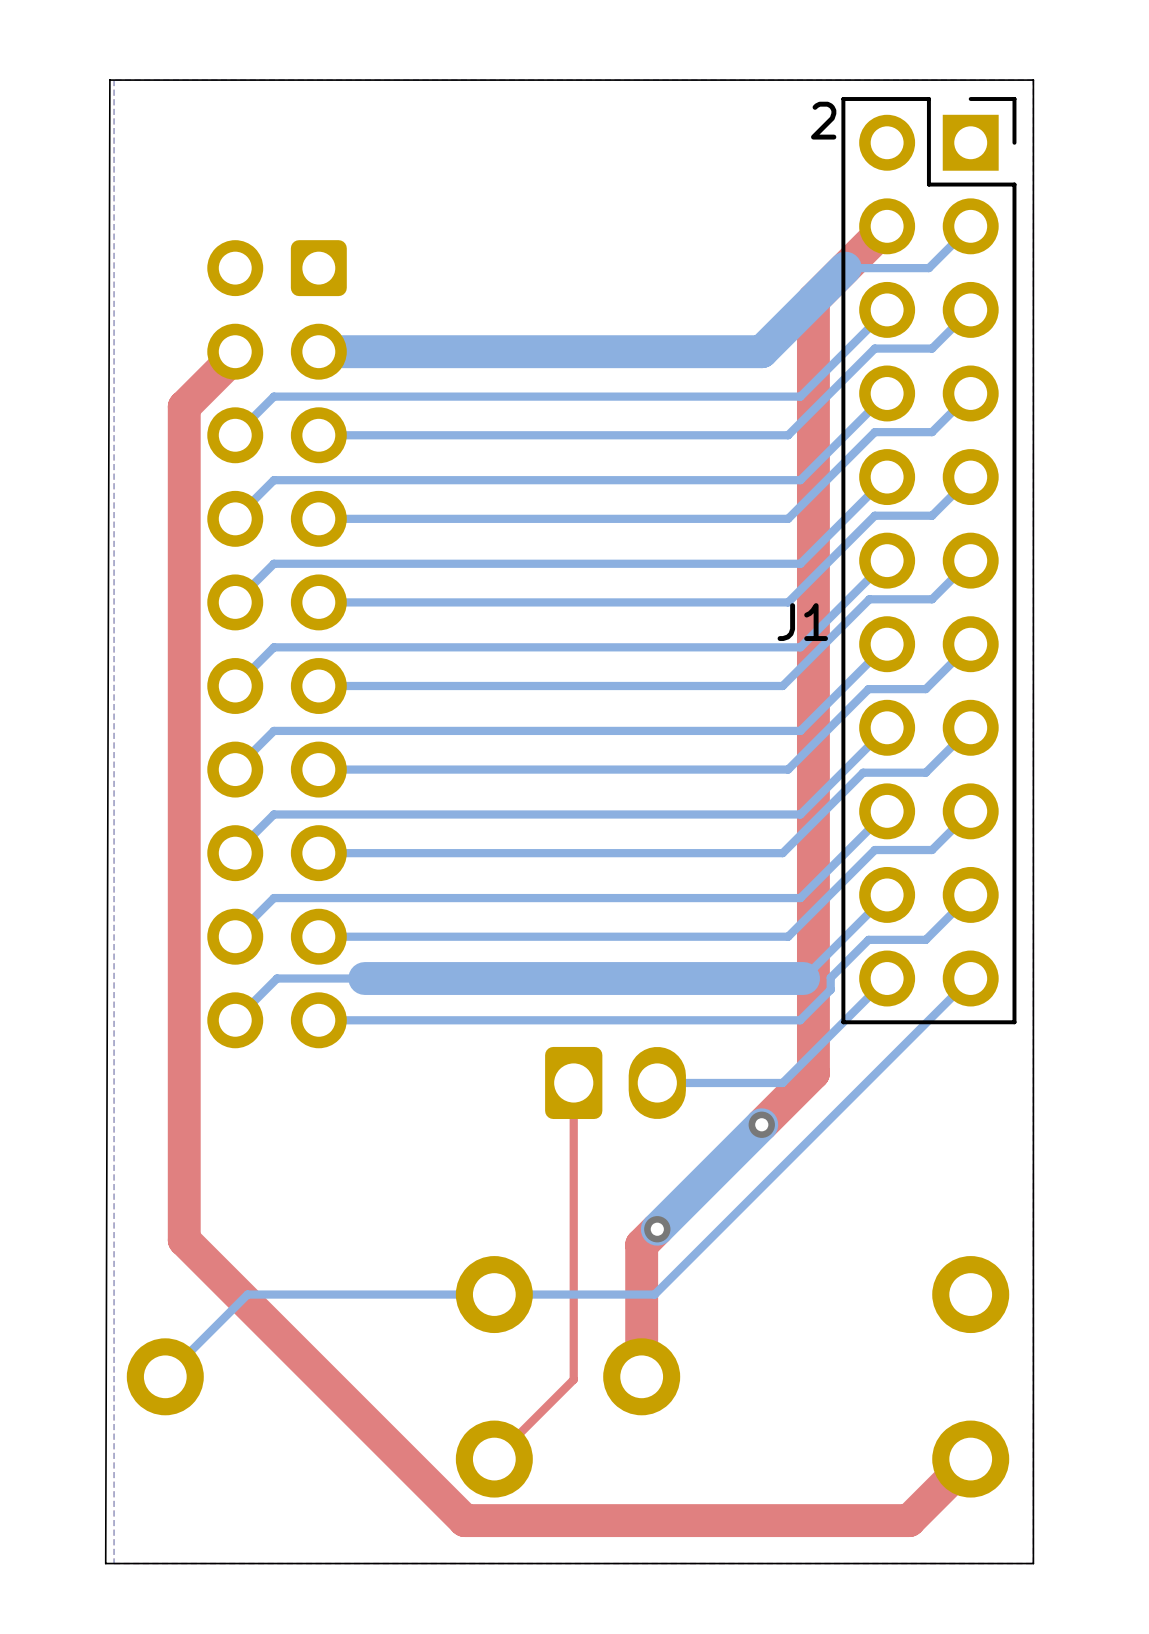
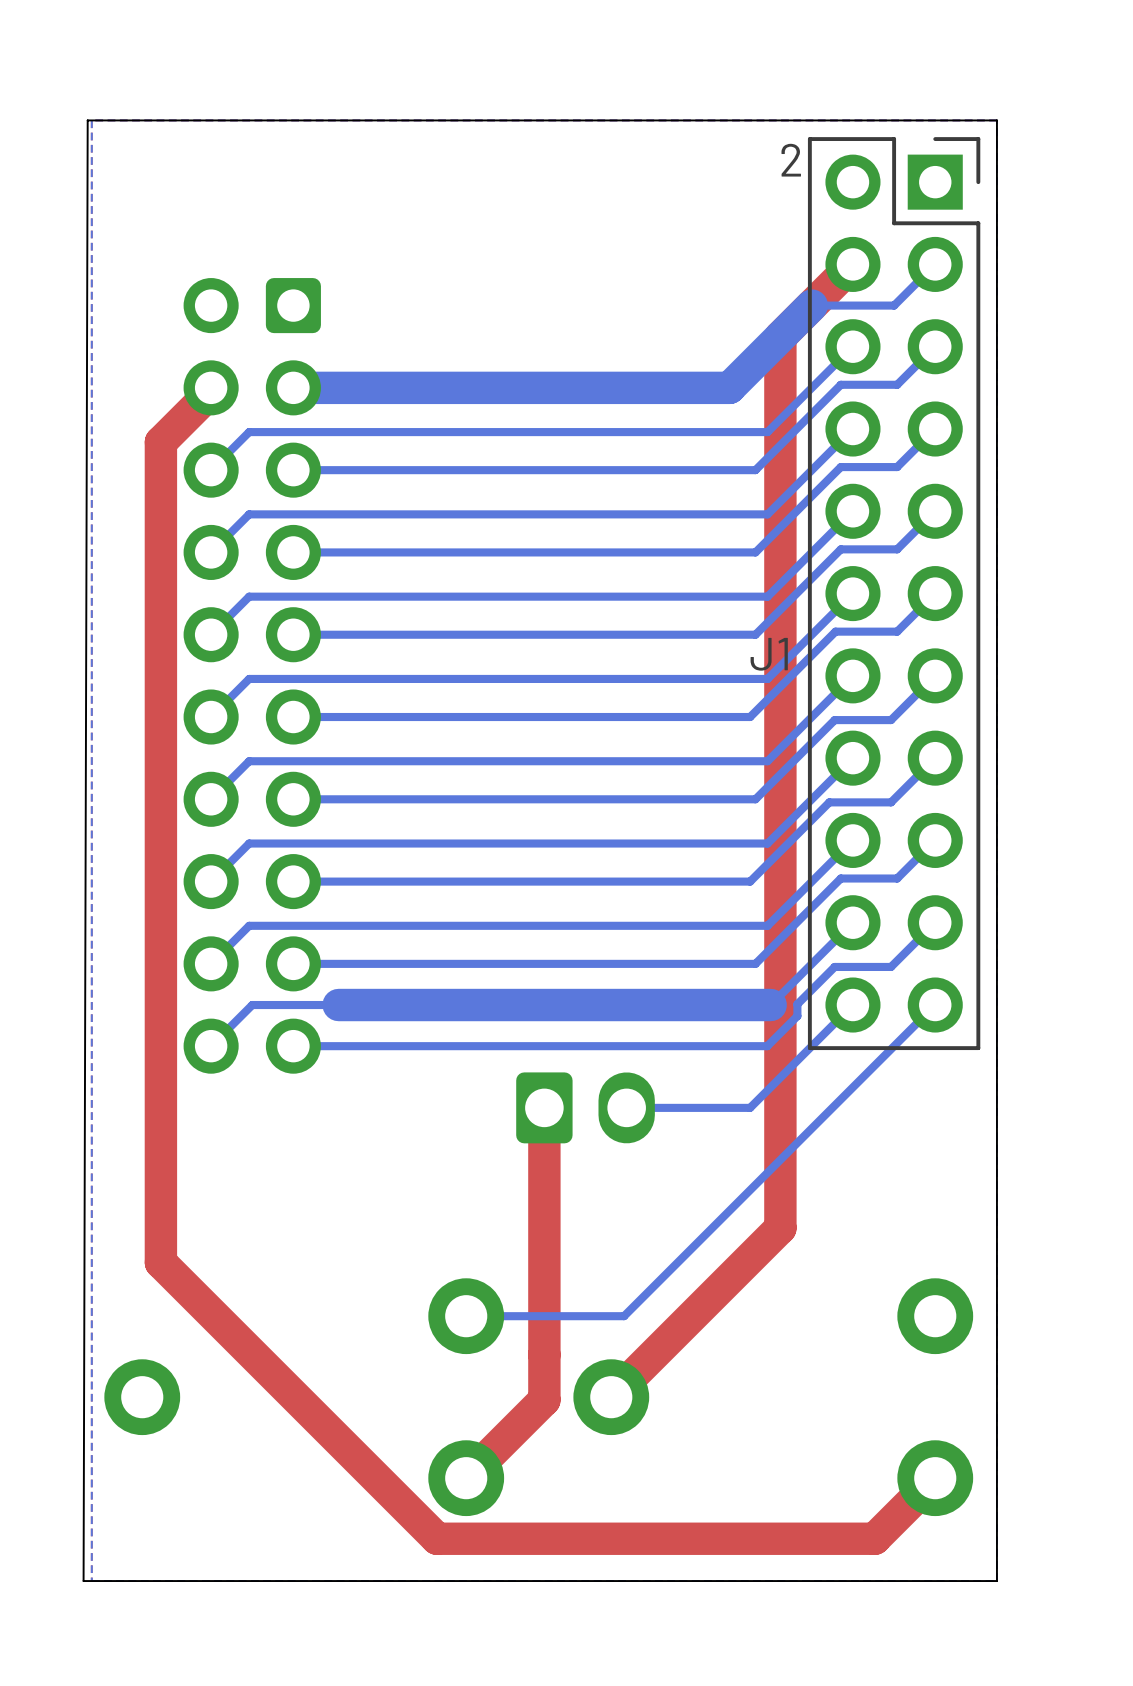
top track: (813, 1073) (761, 1124) -> none
top track width: thin (573, 1082) (573, 1379) (494, 1459) -> thick (544, 1107) (544, 1400) (466, 1478)
bottom track: (761, 1124) (657, 1229) -> none
via: (761, 1124) -> none
top track: (657, 1229) (641, 1244) (641, 1376) -> (780, 1098) (780, 1228) (611, 1397)
via: (657, 1229) -> none
bottom track: (494, 1294) (247, 1294) (165, 1376) -> none

